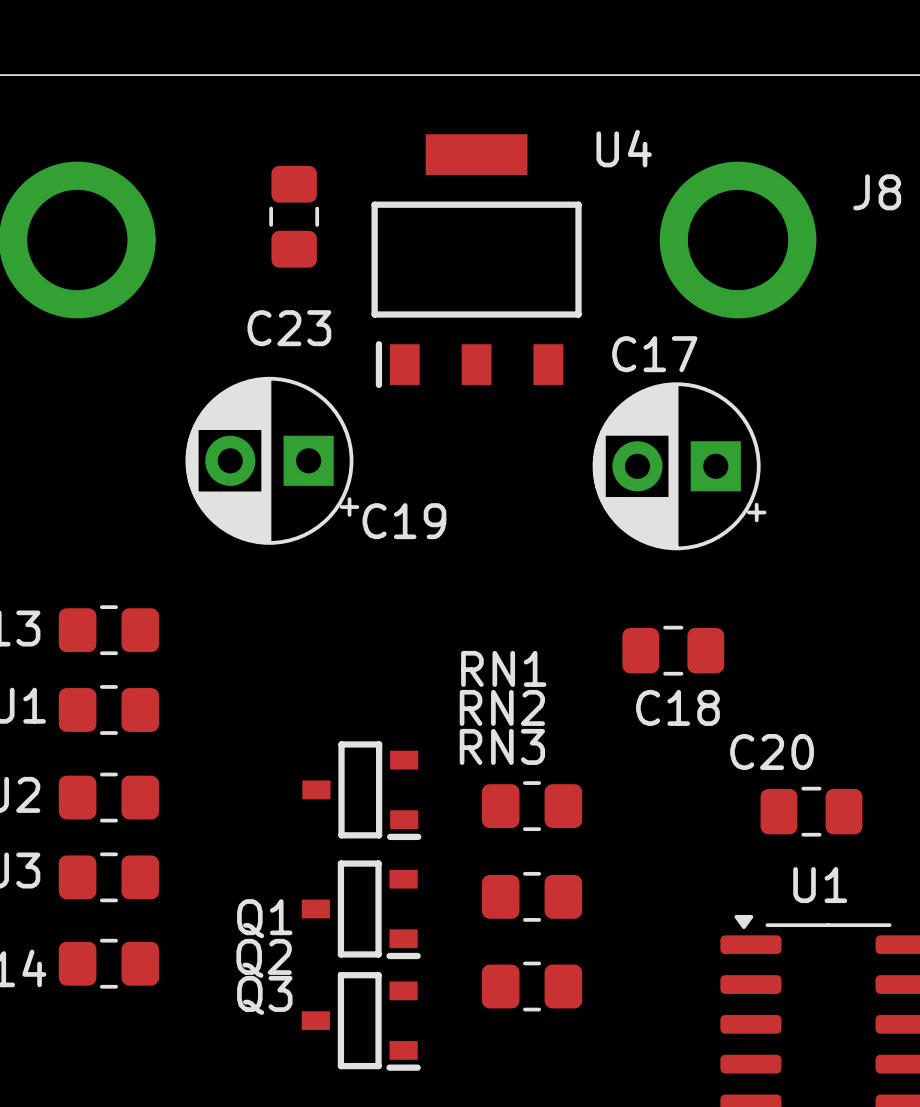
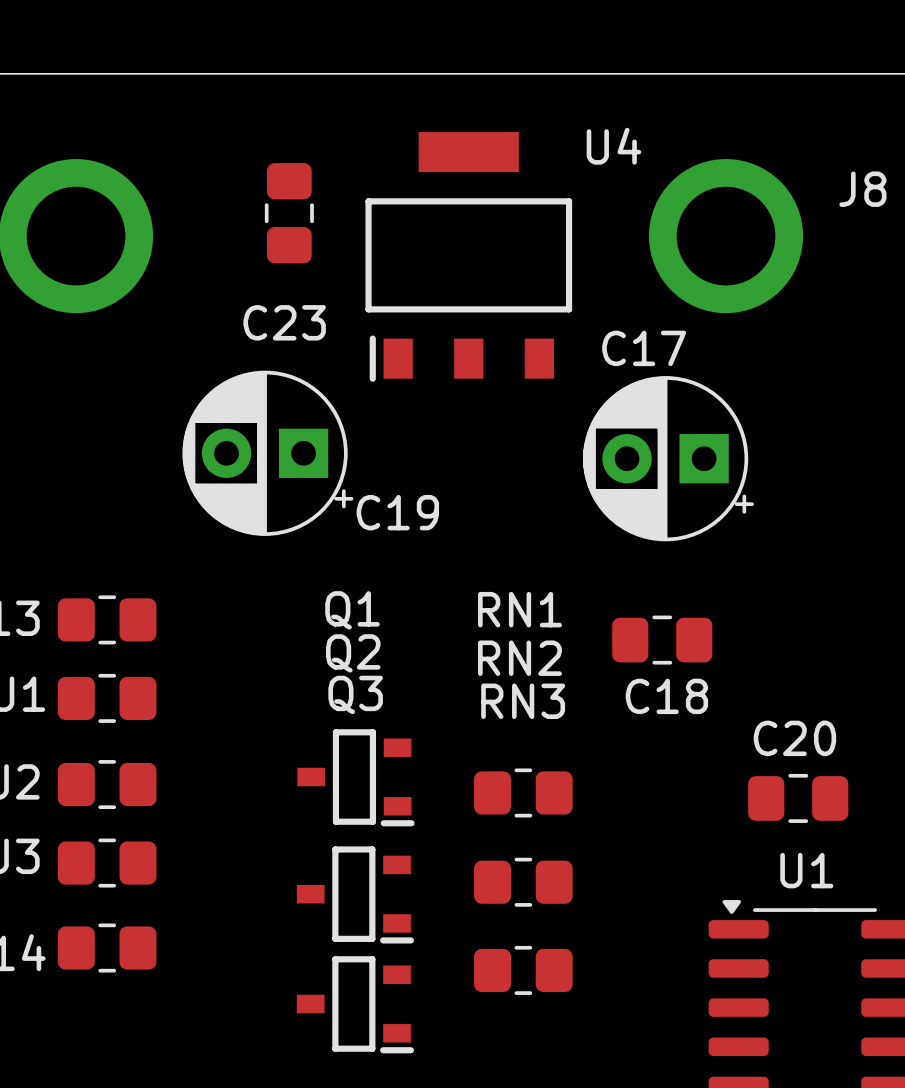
RN1 name position: RN1 (503, 668) -> RN1 (520, 609)
RN2 name position: RN2 (502, 707) -> RN2 (520, 658)
RN3 name position: RN3 (502, 746) -> RN3 (523, 701)
C20 name position: C20 (772, 752) -> C20 (794, 738)
Q1 name position: Q1 (264, 918) -> Q1 (352, 610)
Q2 name position: Q2 (264, 958) -> Q2 (353, 653)
Q3 name position: Q3 (264, 995) -> Q3 (355, 694)

